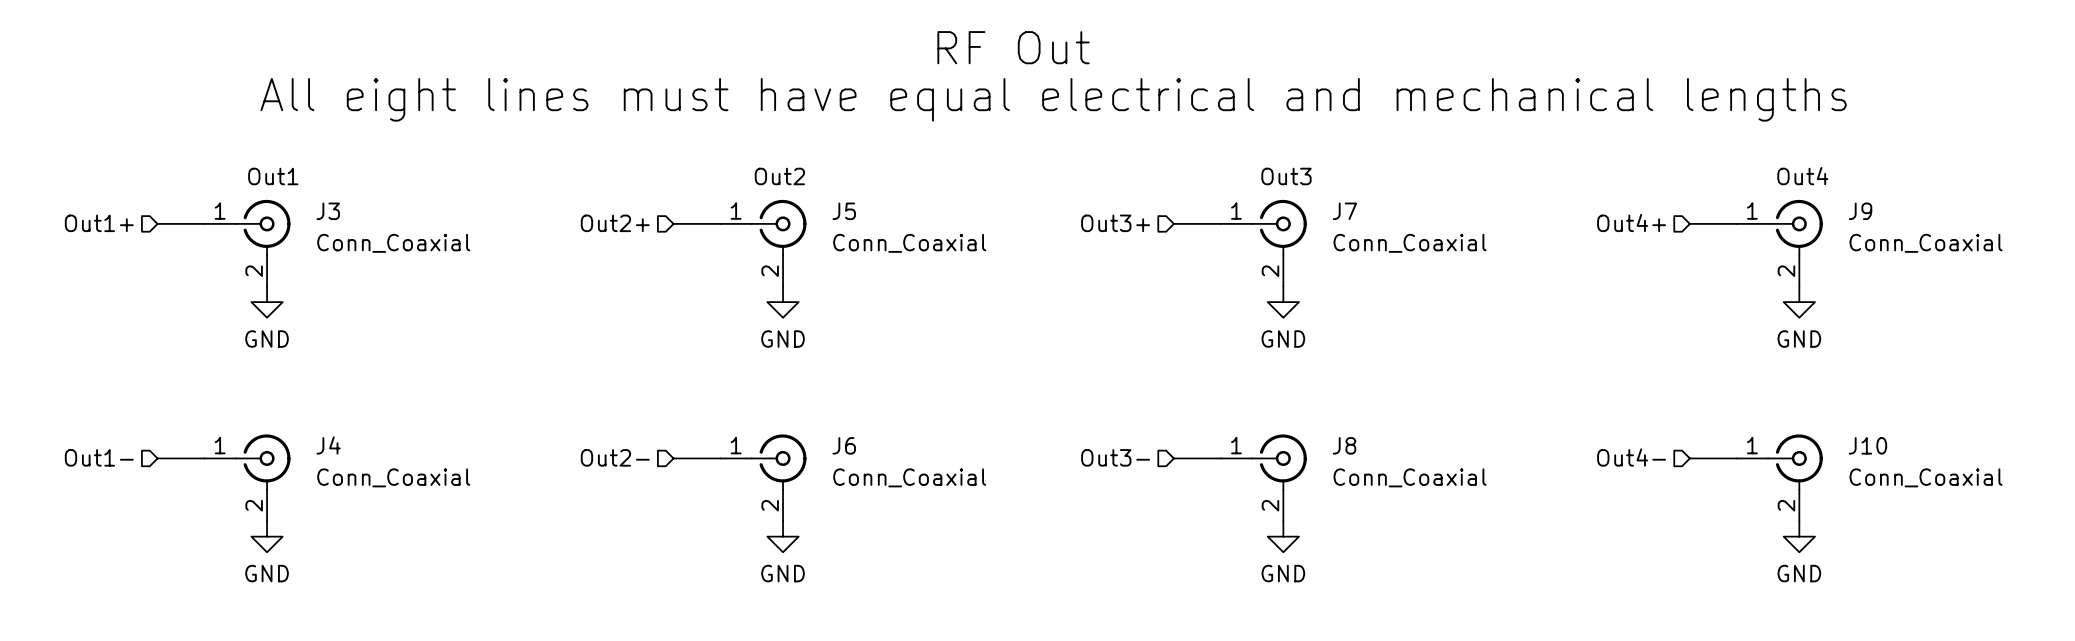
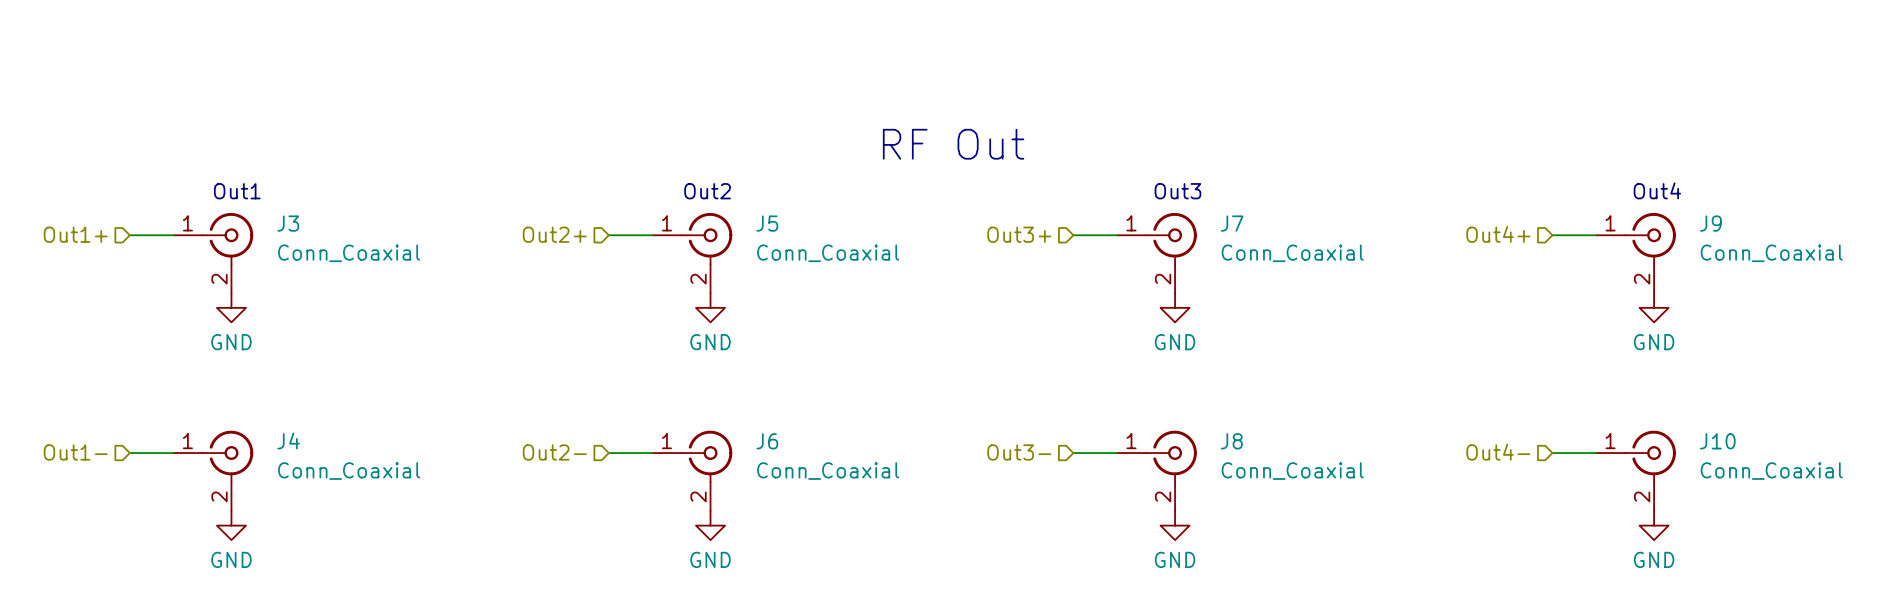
text position: RF Out (1013, 47) -> RF Out (953, 144)
text: All eight lines must have equal electrical and mechanical lengths (1053, 99) -> none

